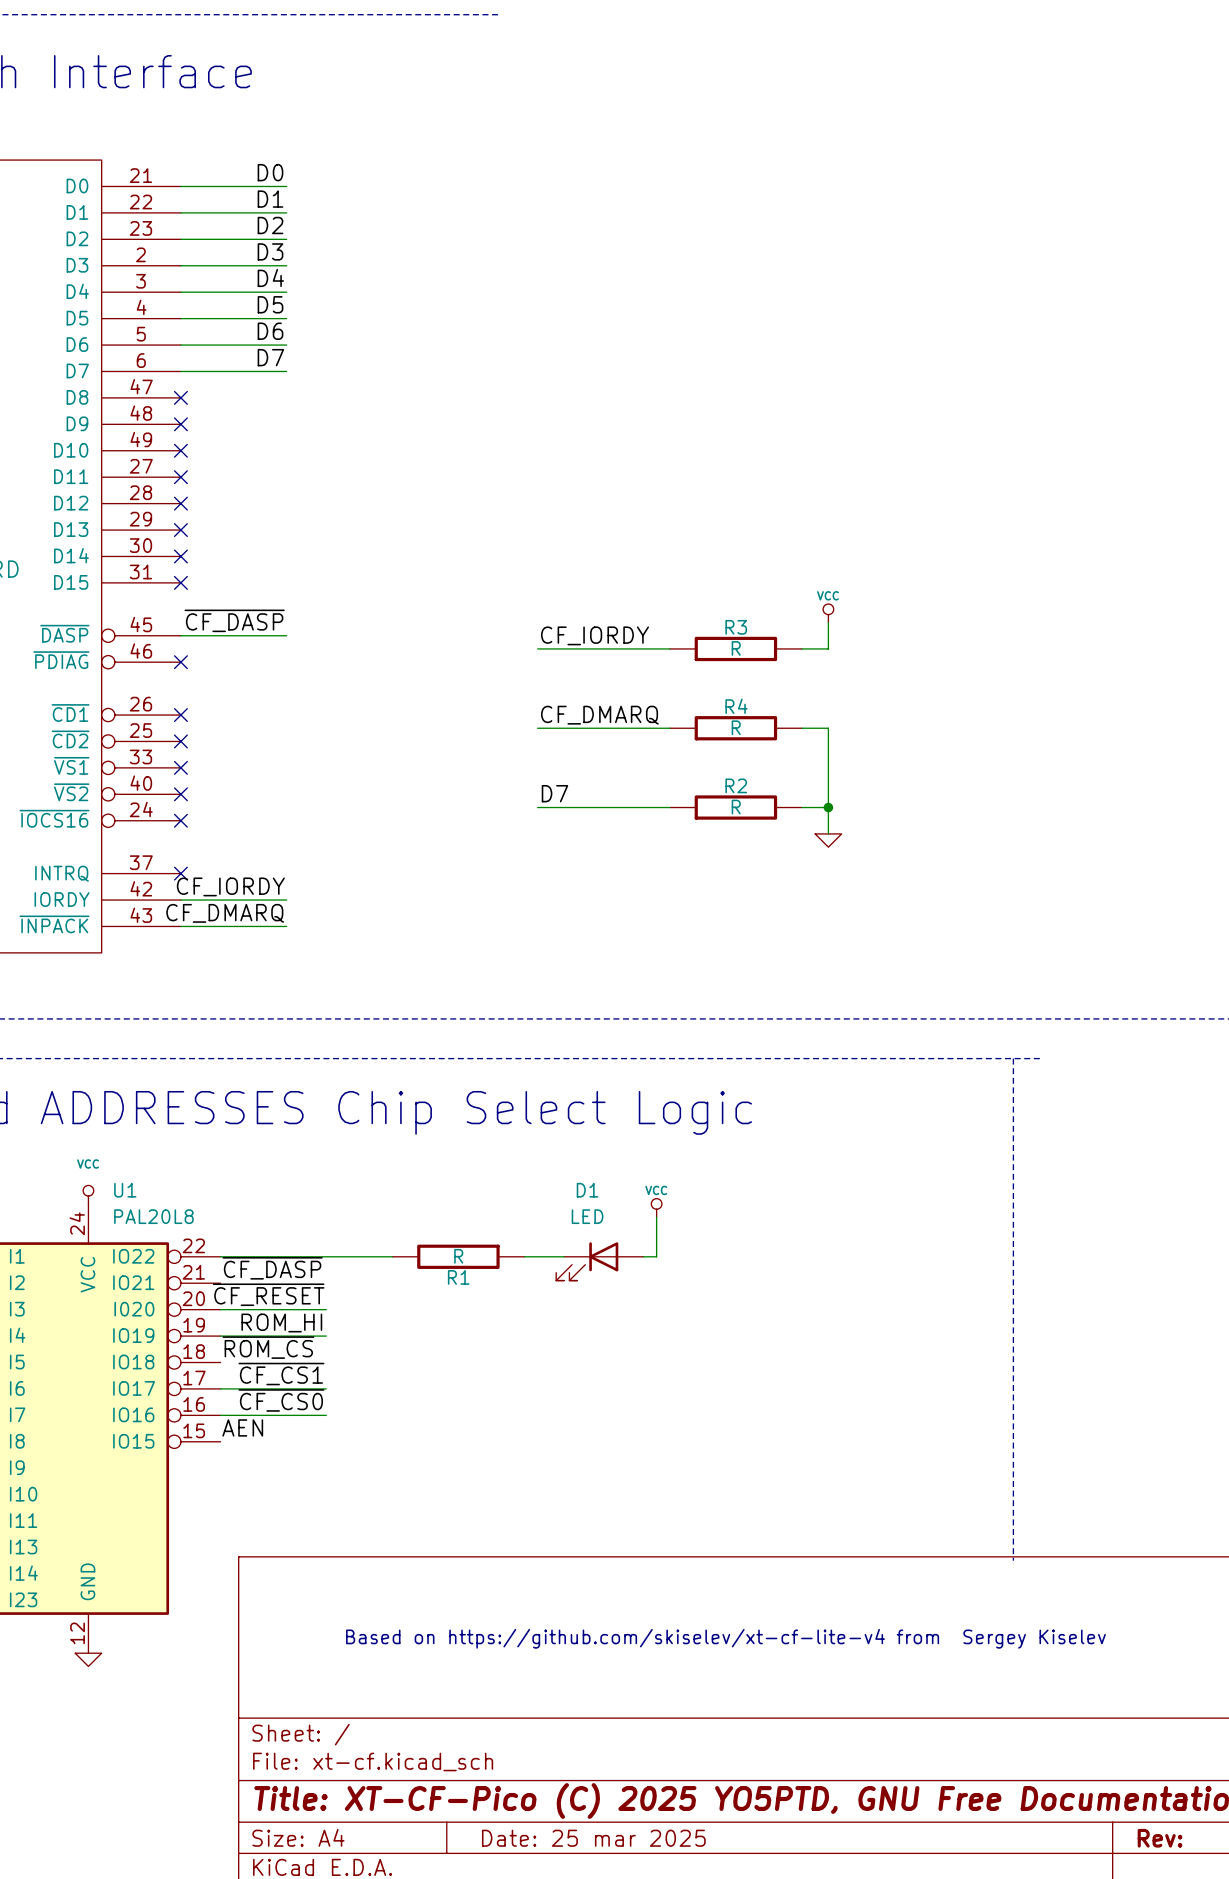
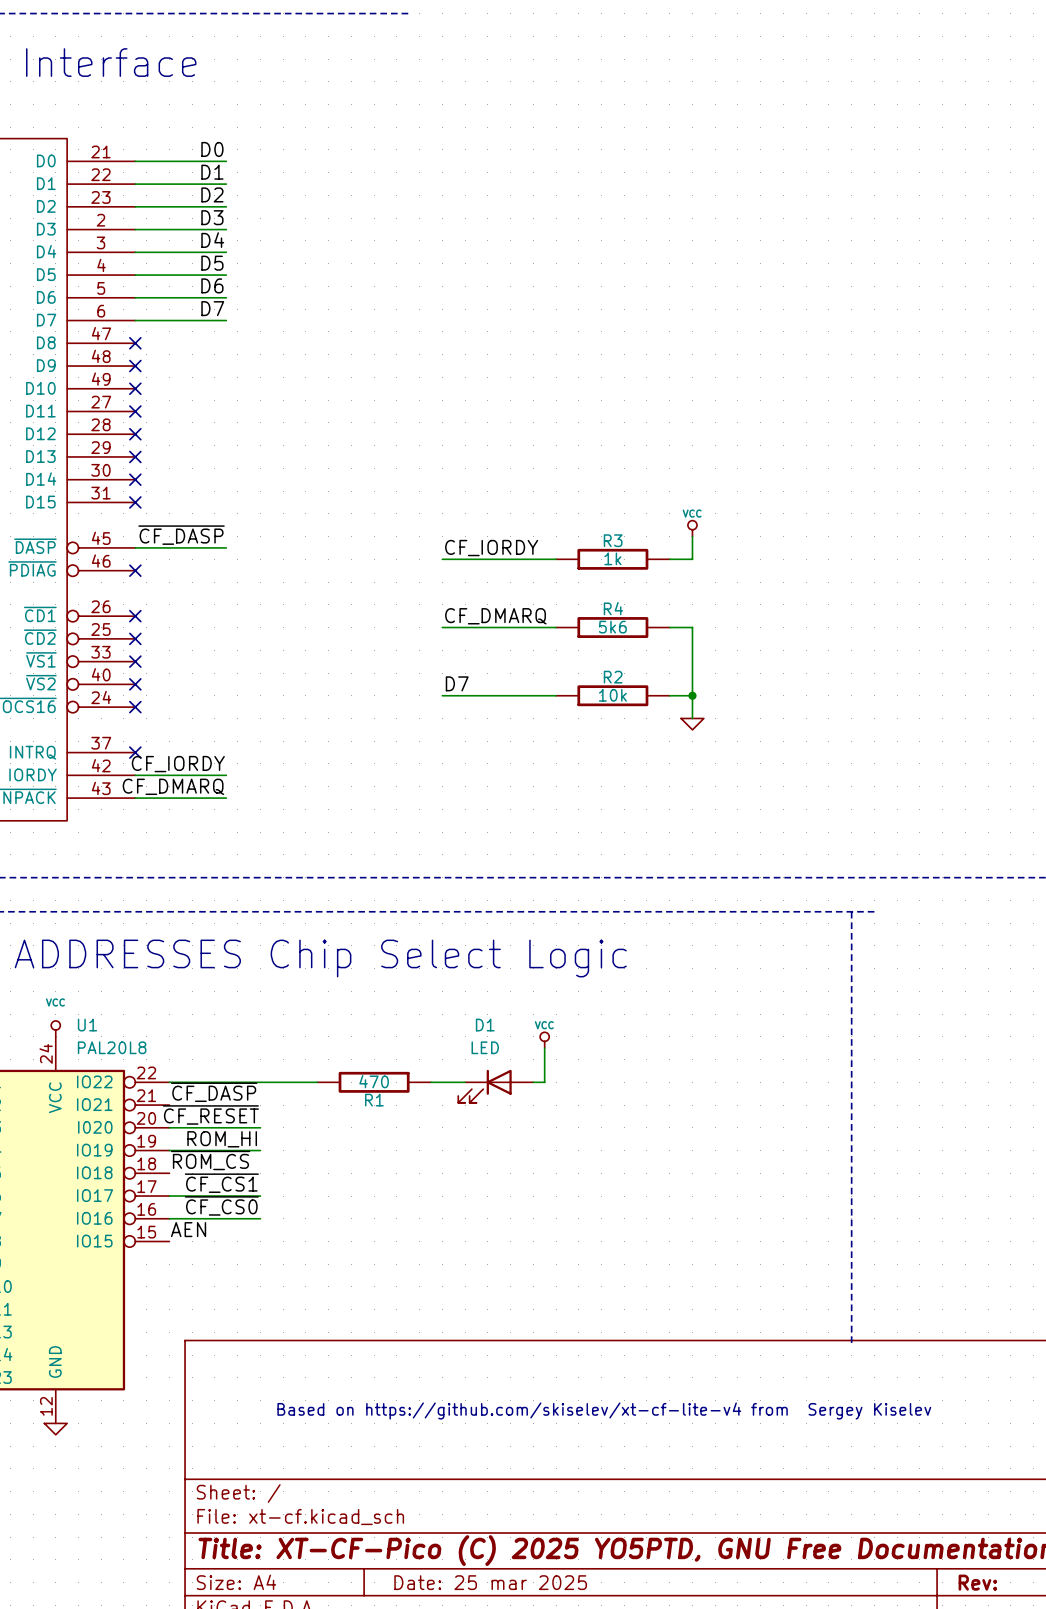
R3 value: R (736, 648) -> 1k (612, 558)
R4 value: R (736, 727) -> 5k6 (612, 627)
R2 value: R (736, 807) -> 10k (612, 695)
R1 value: R (458, 1256) -> 470 (374, 1081)

